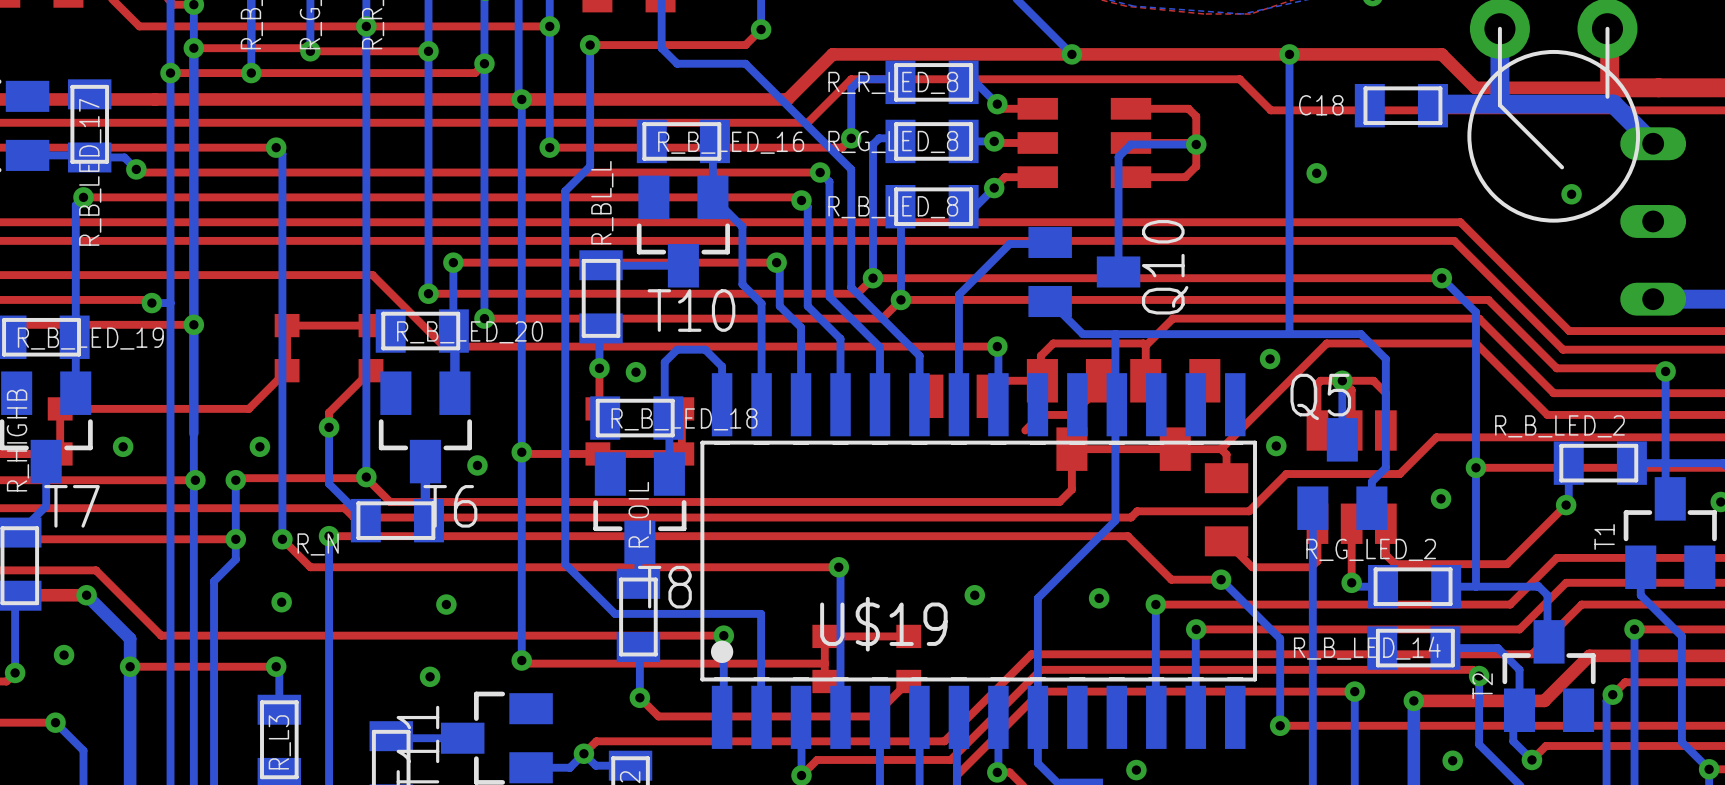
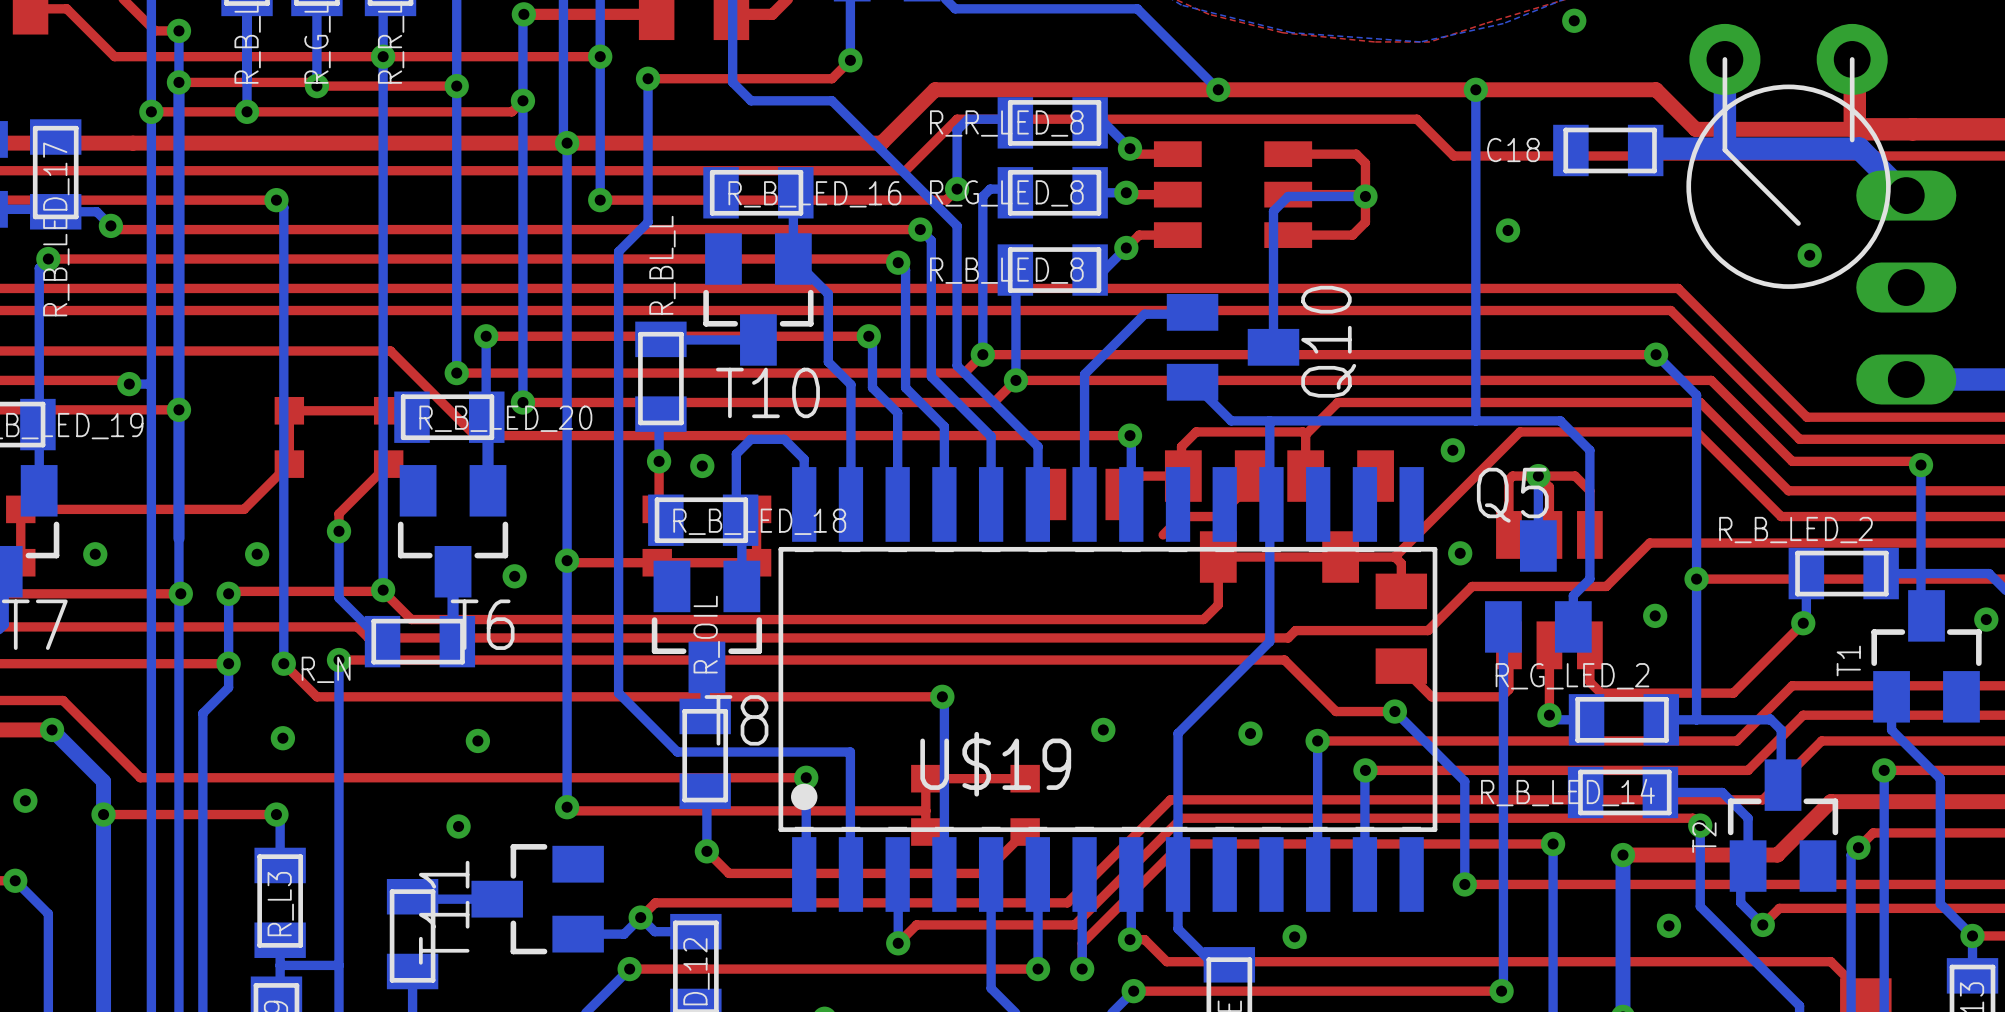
part footprint: [1620, 127, 1687, 316] -> [1856, 170, 1957, 405]

